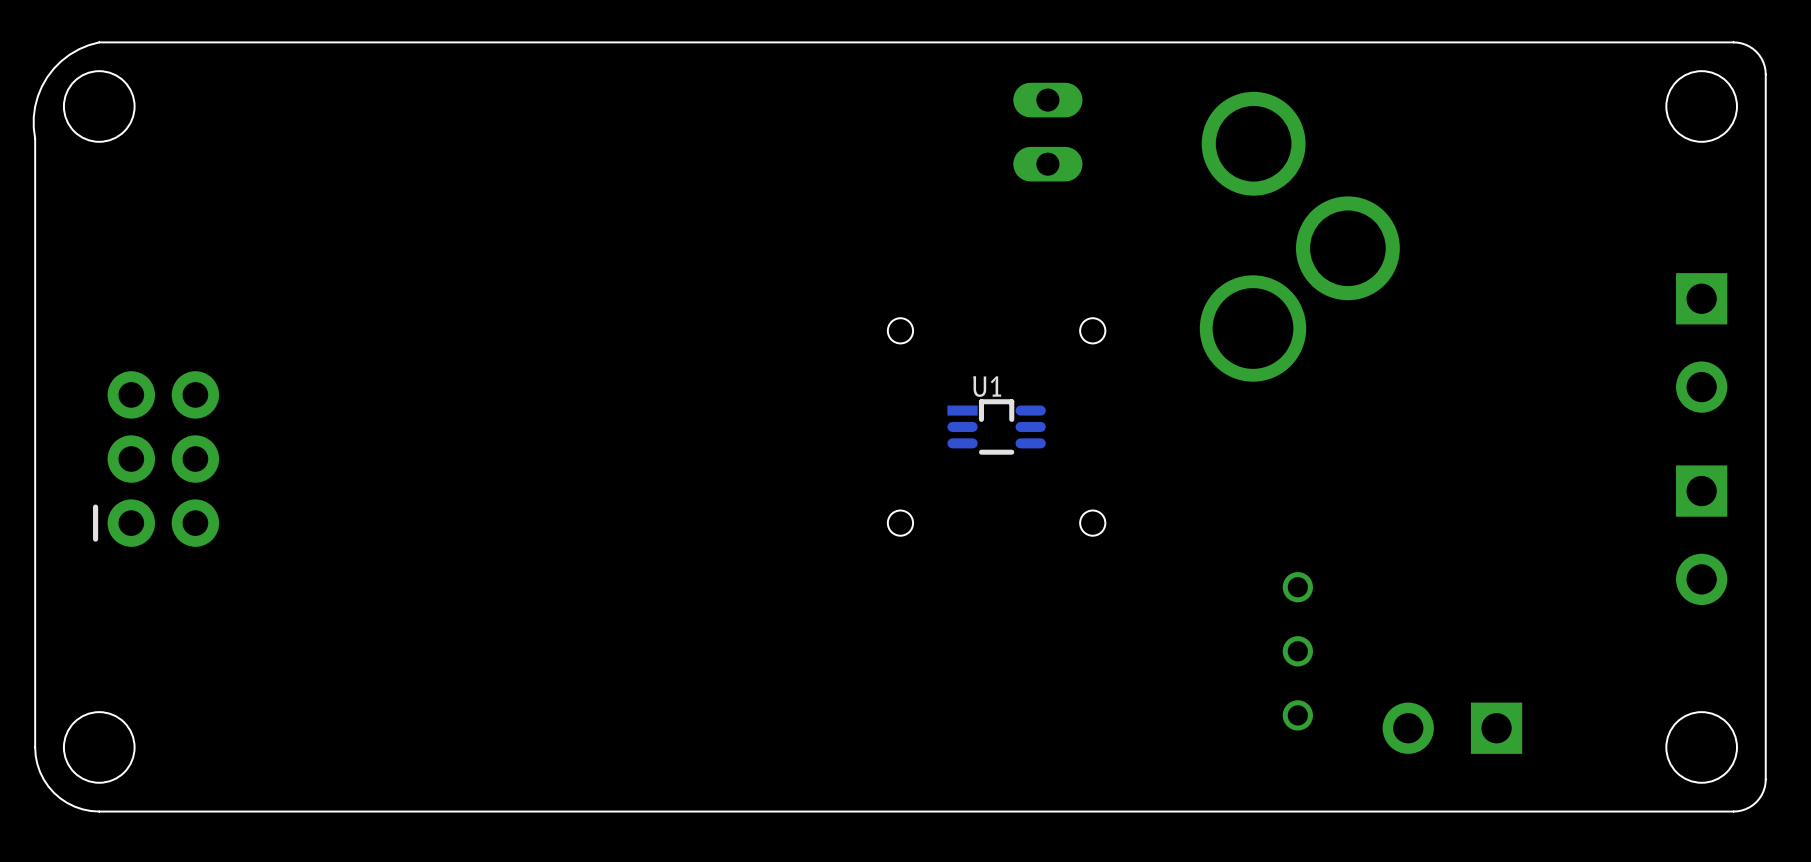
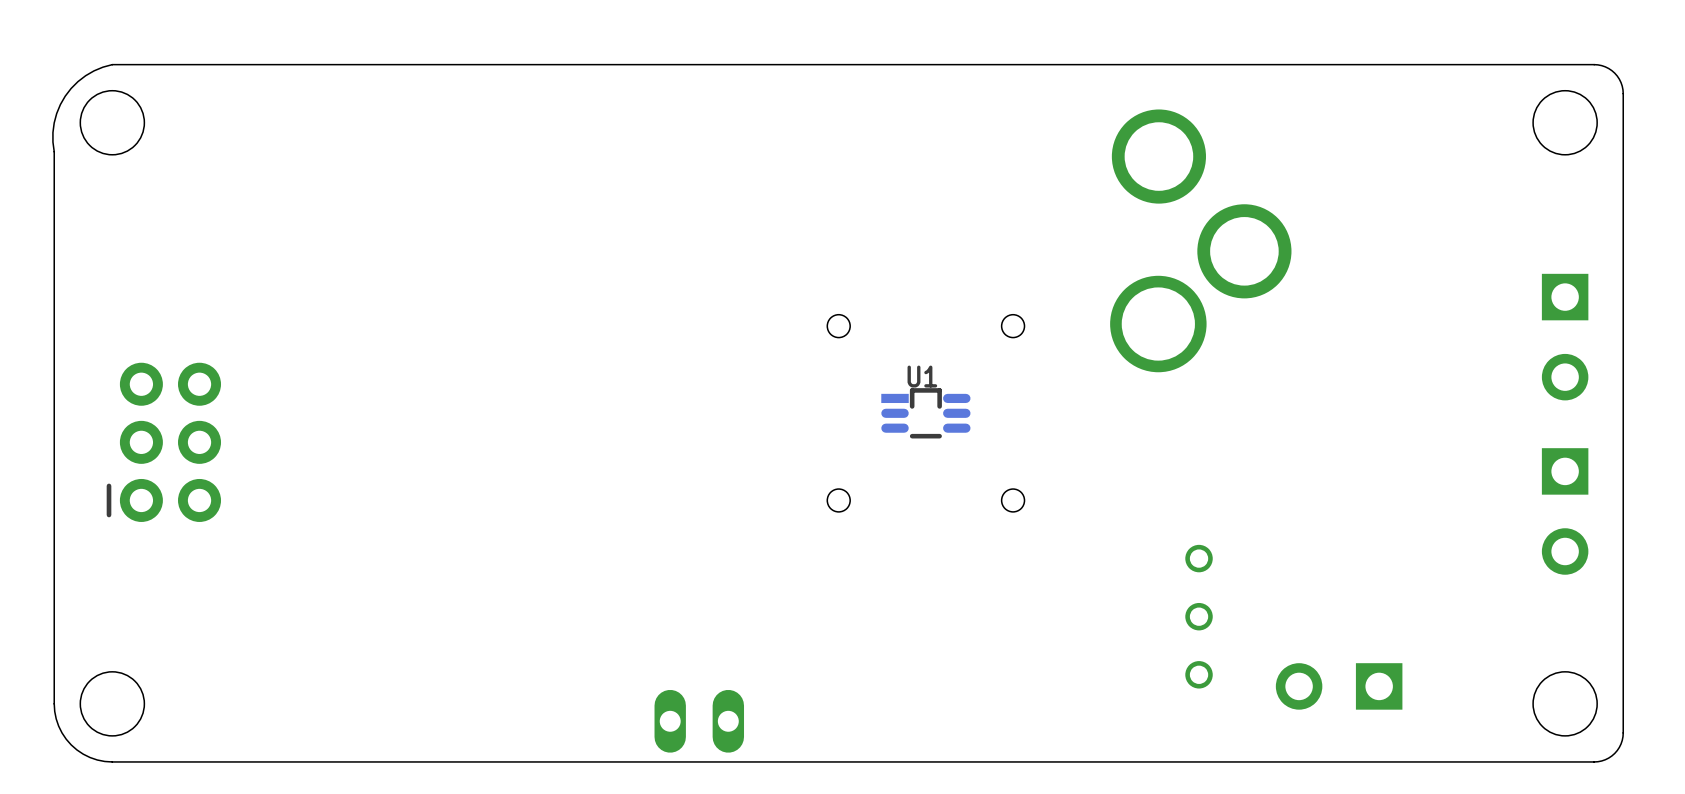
part: (1047, 132) -> none
part: none -> (699, 721)

